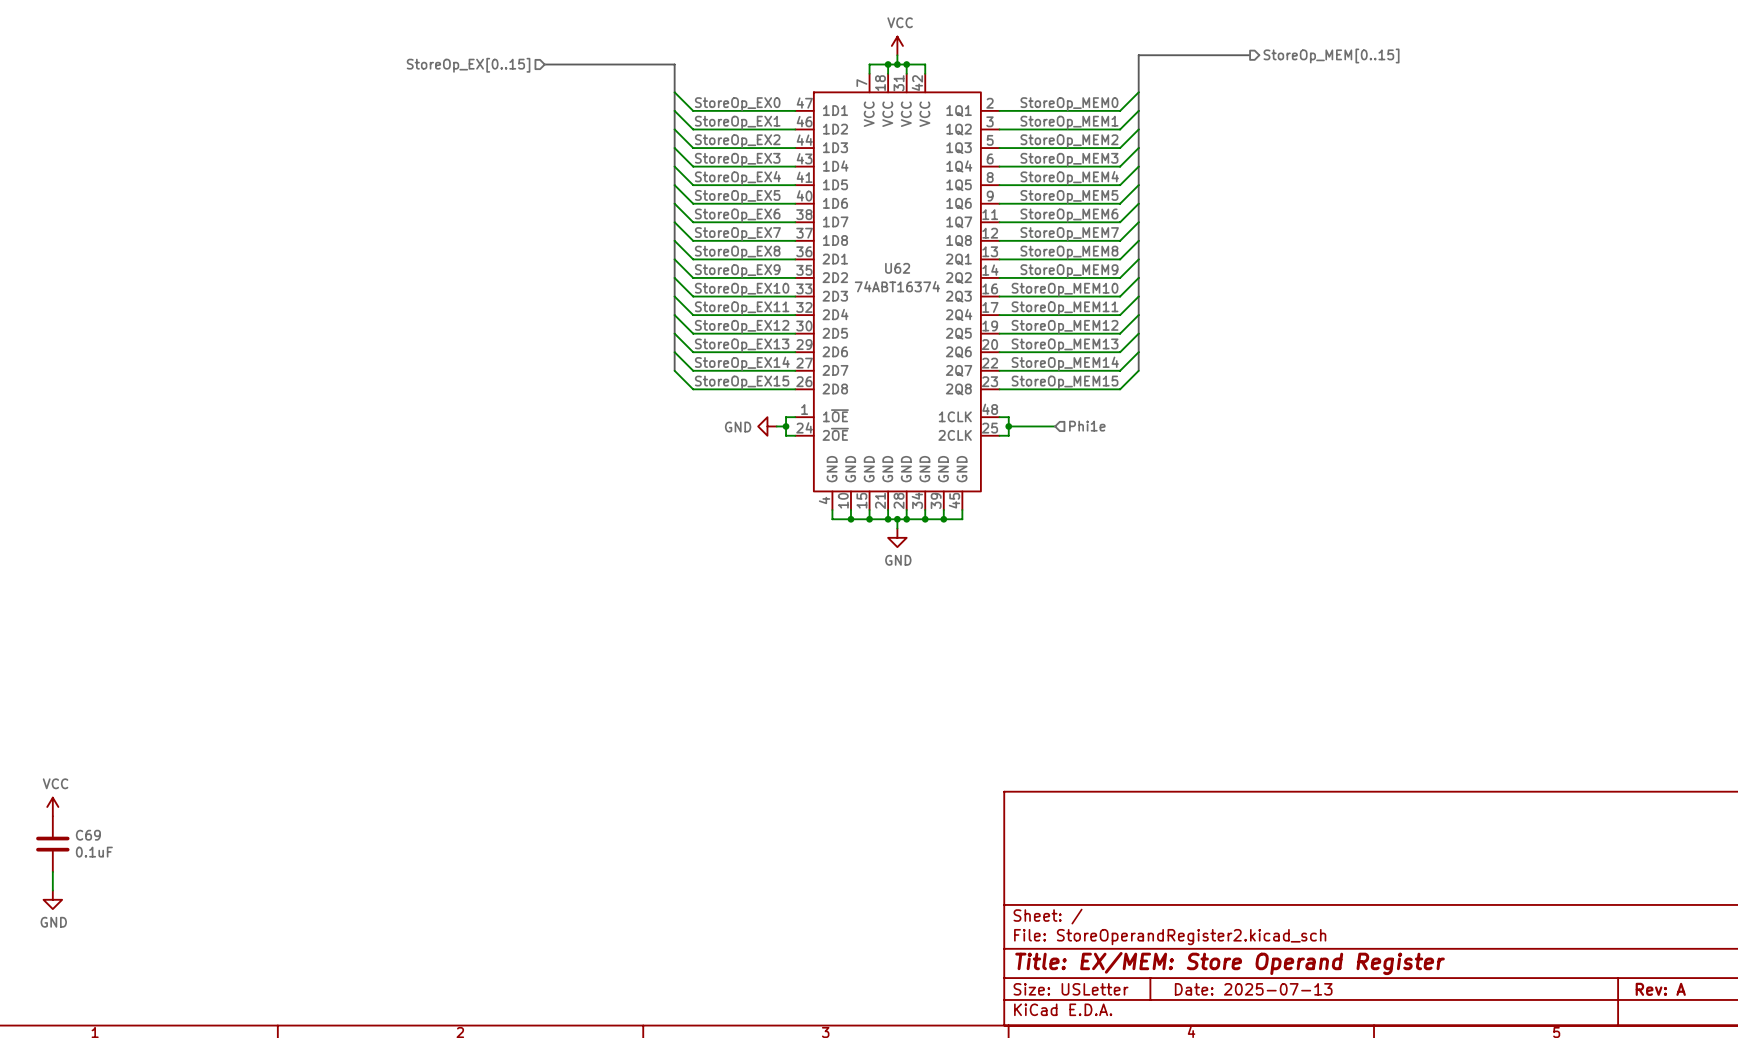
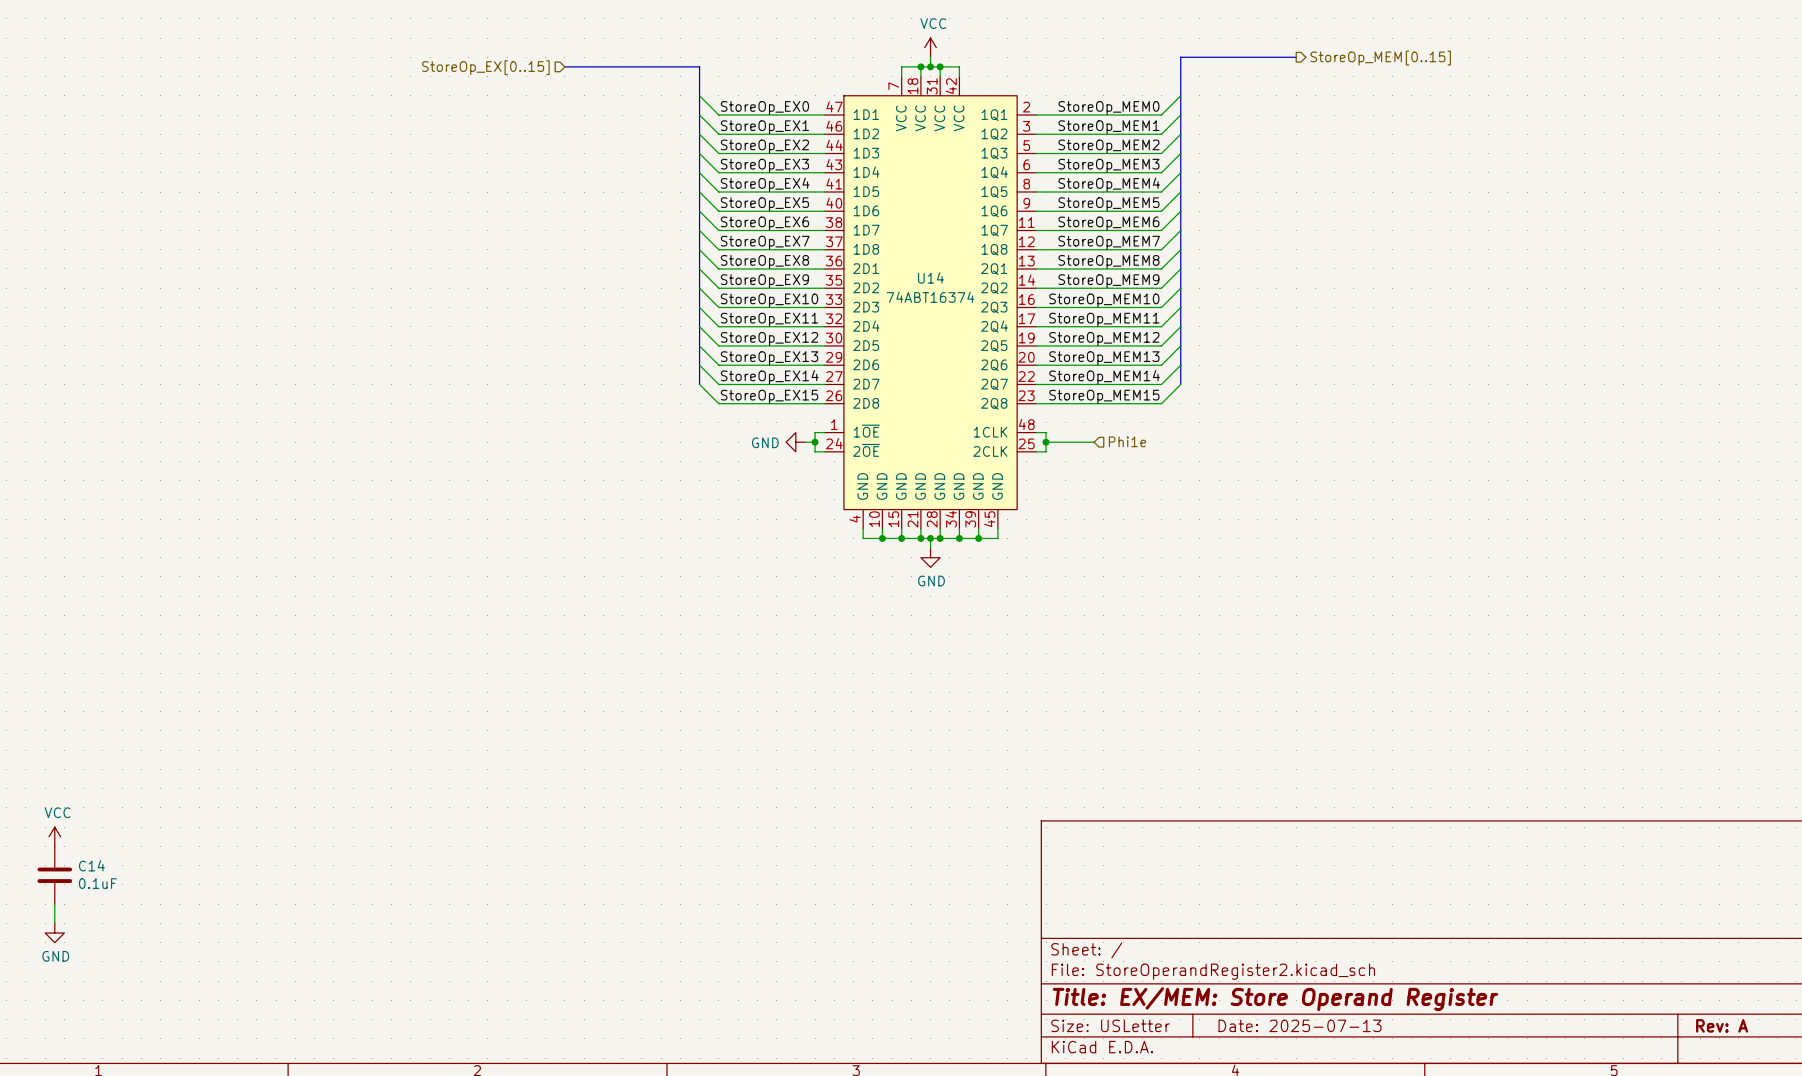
U62 name: U62 (897, 268) -> U14 (930, 278)
C69 name: C69 (88, 835) -> C14 (91, 865)

